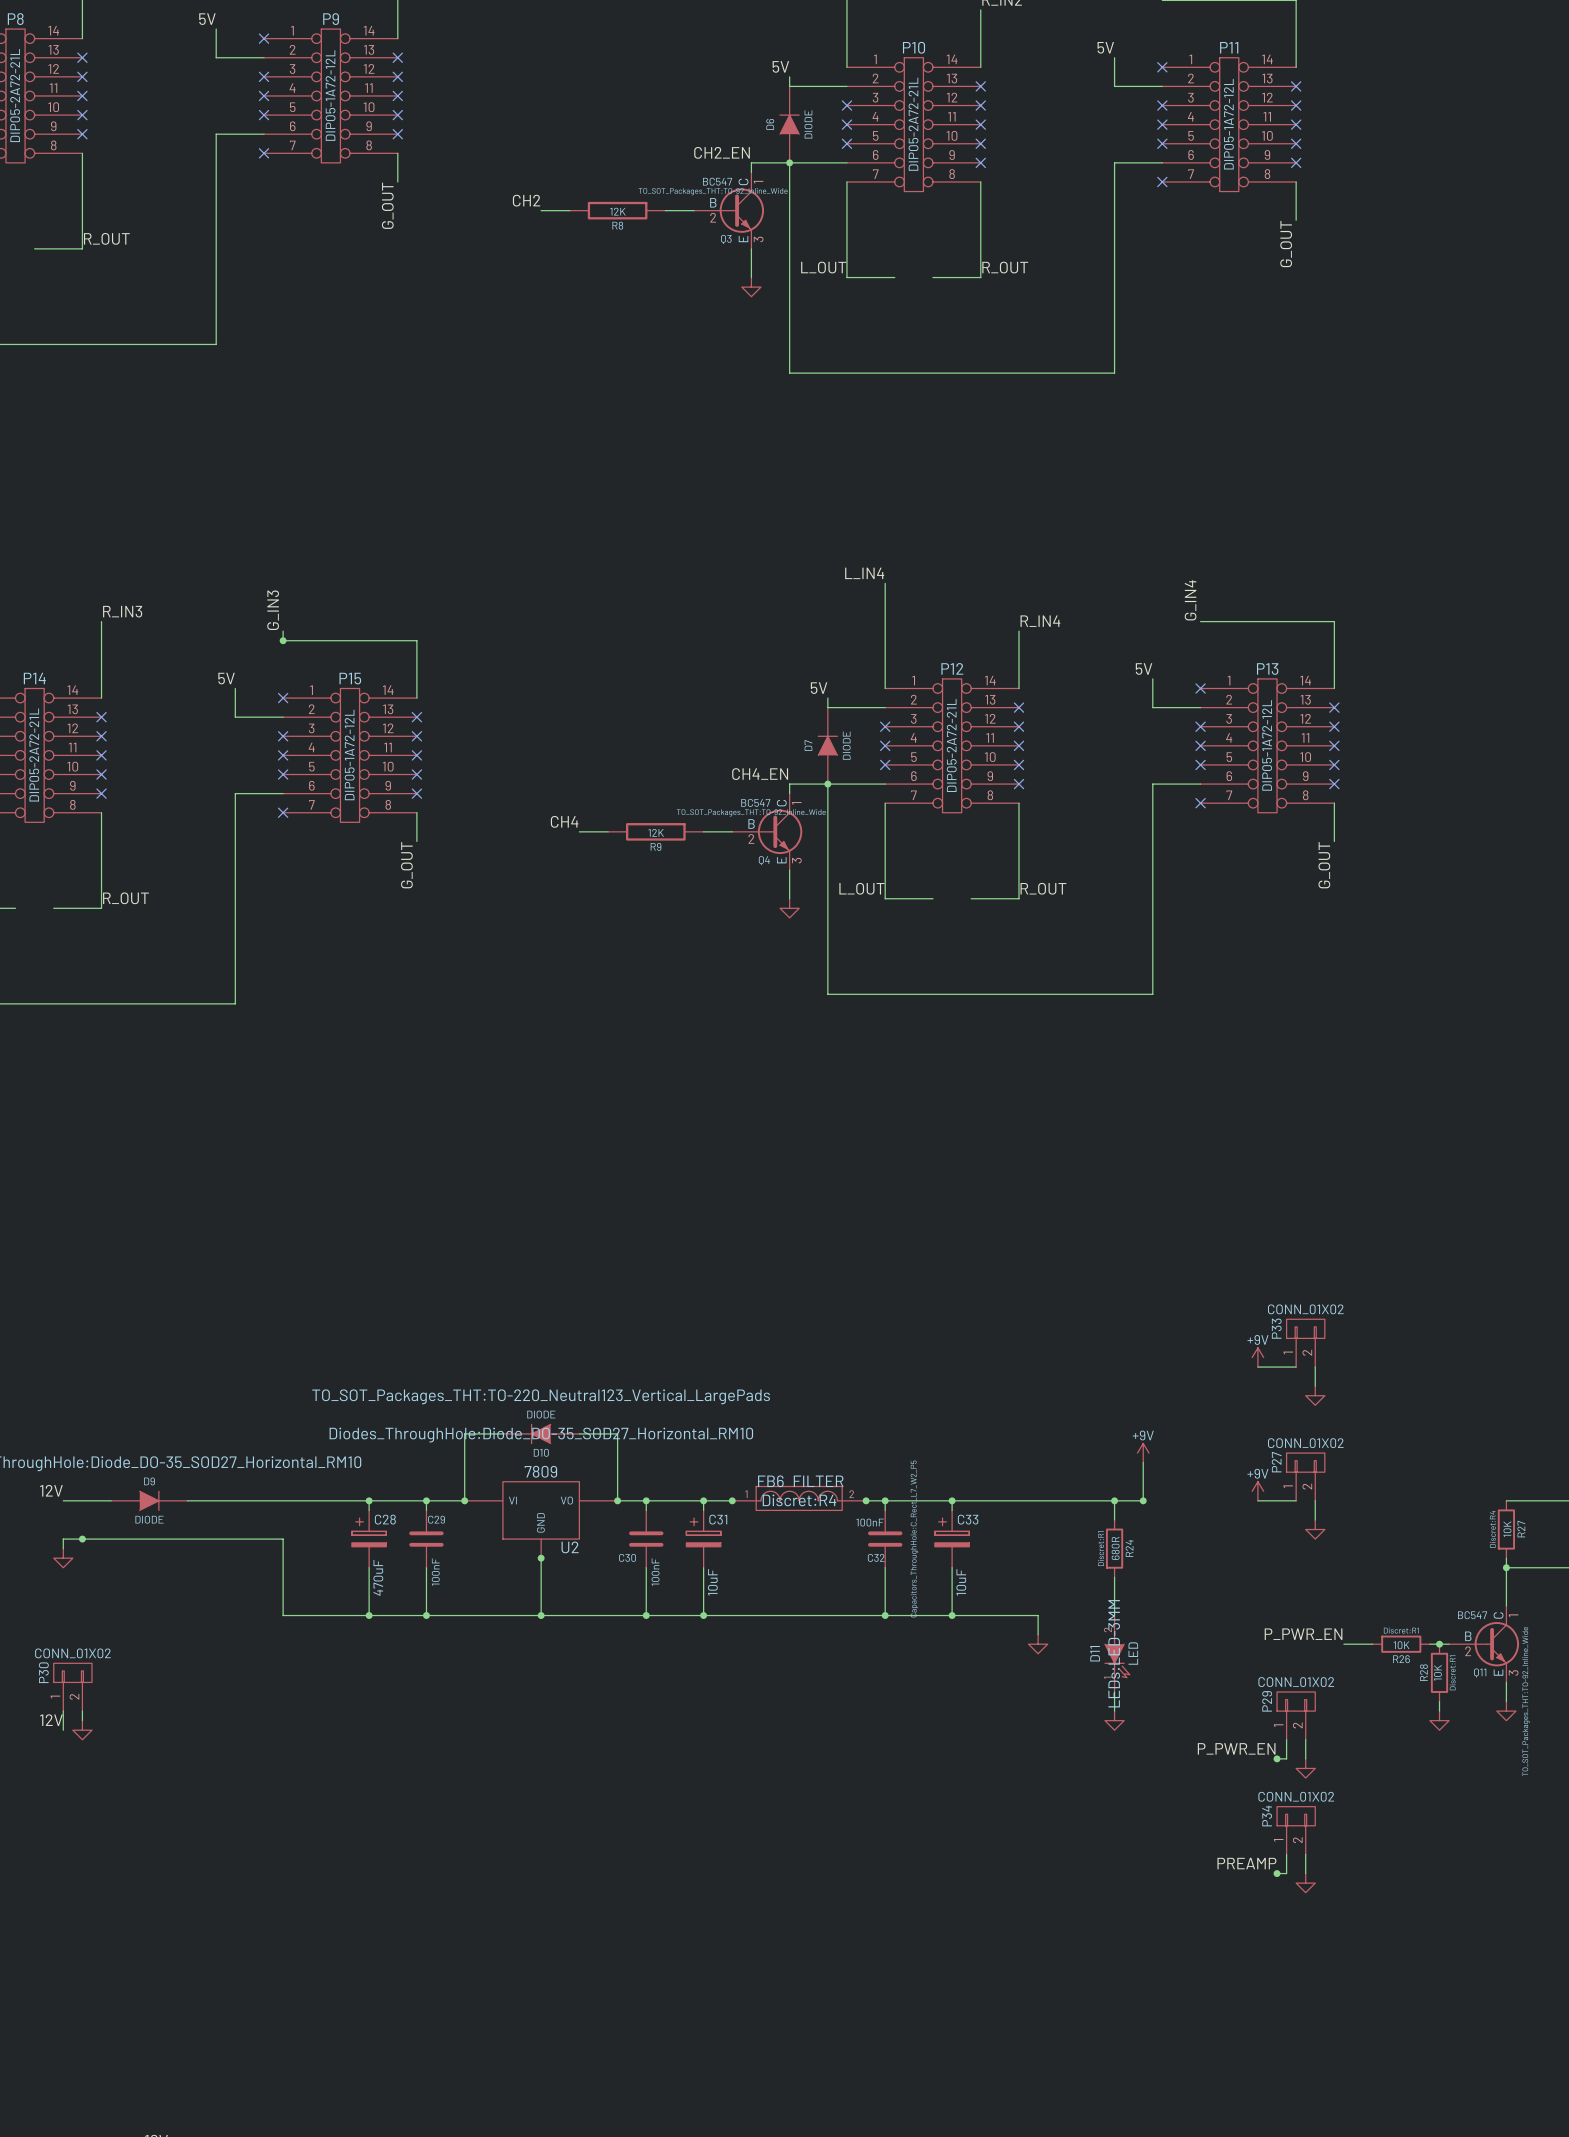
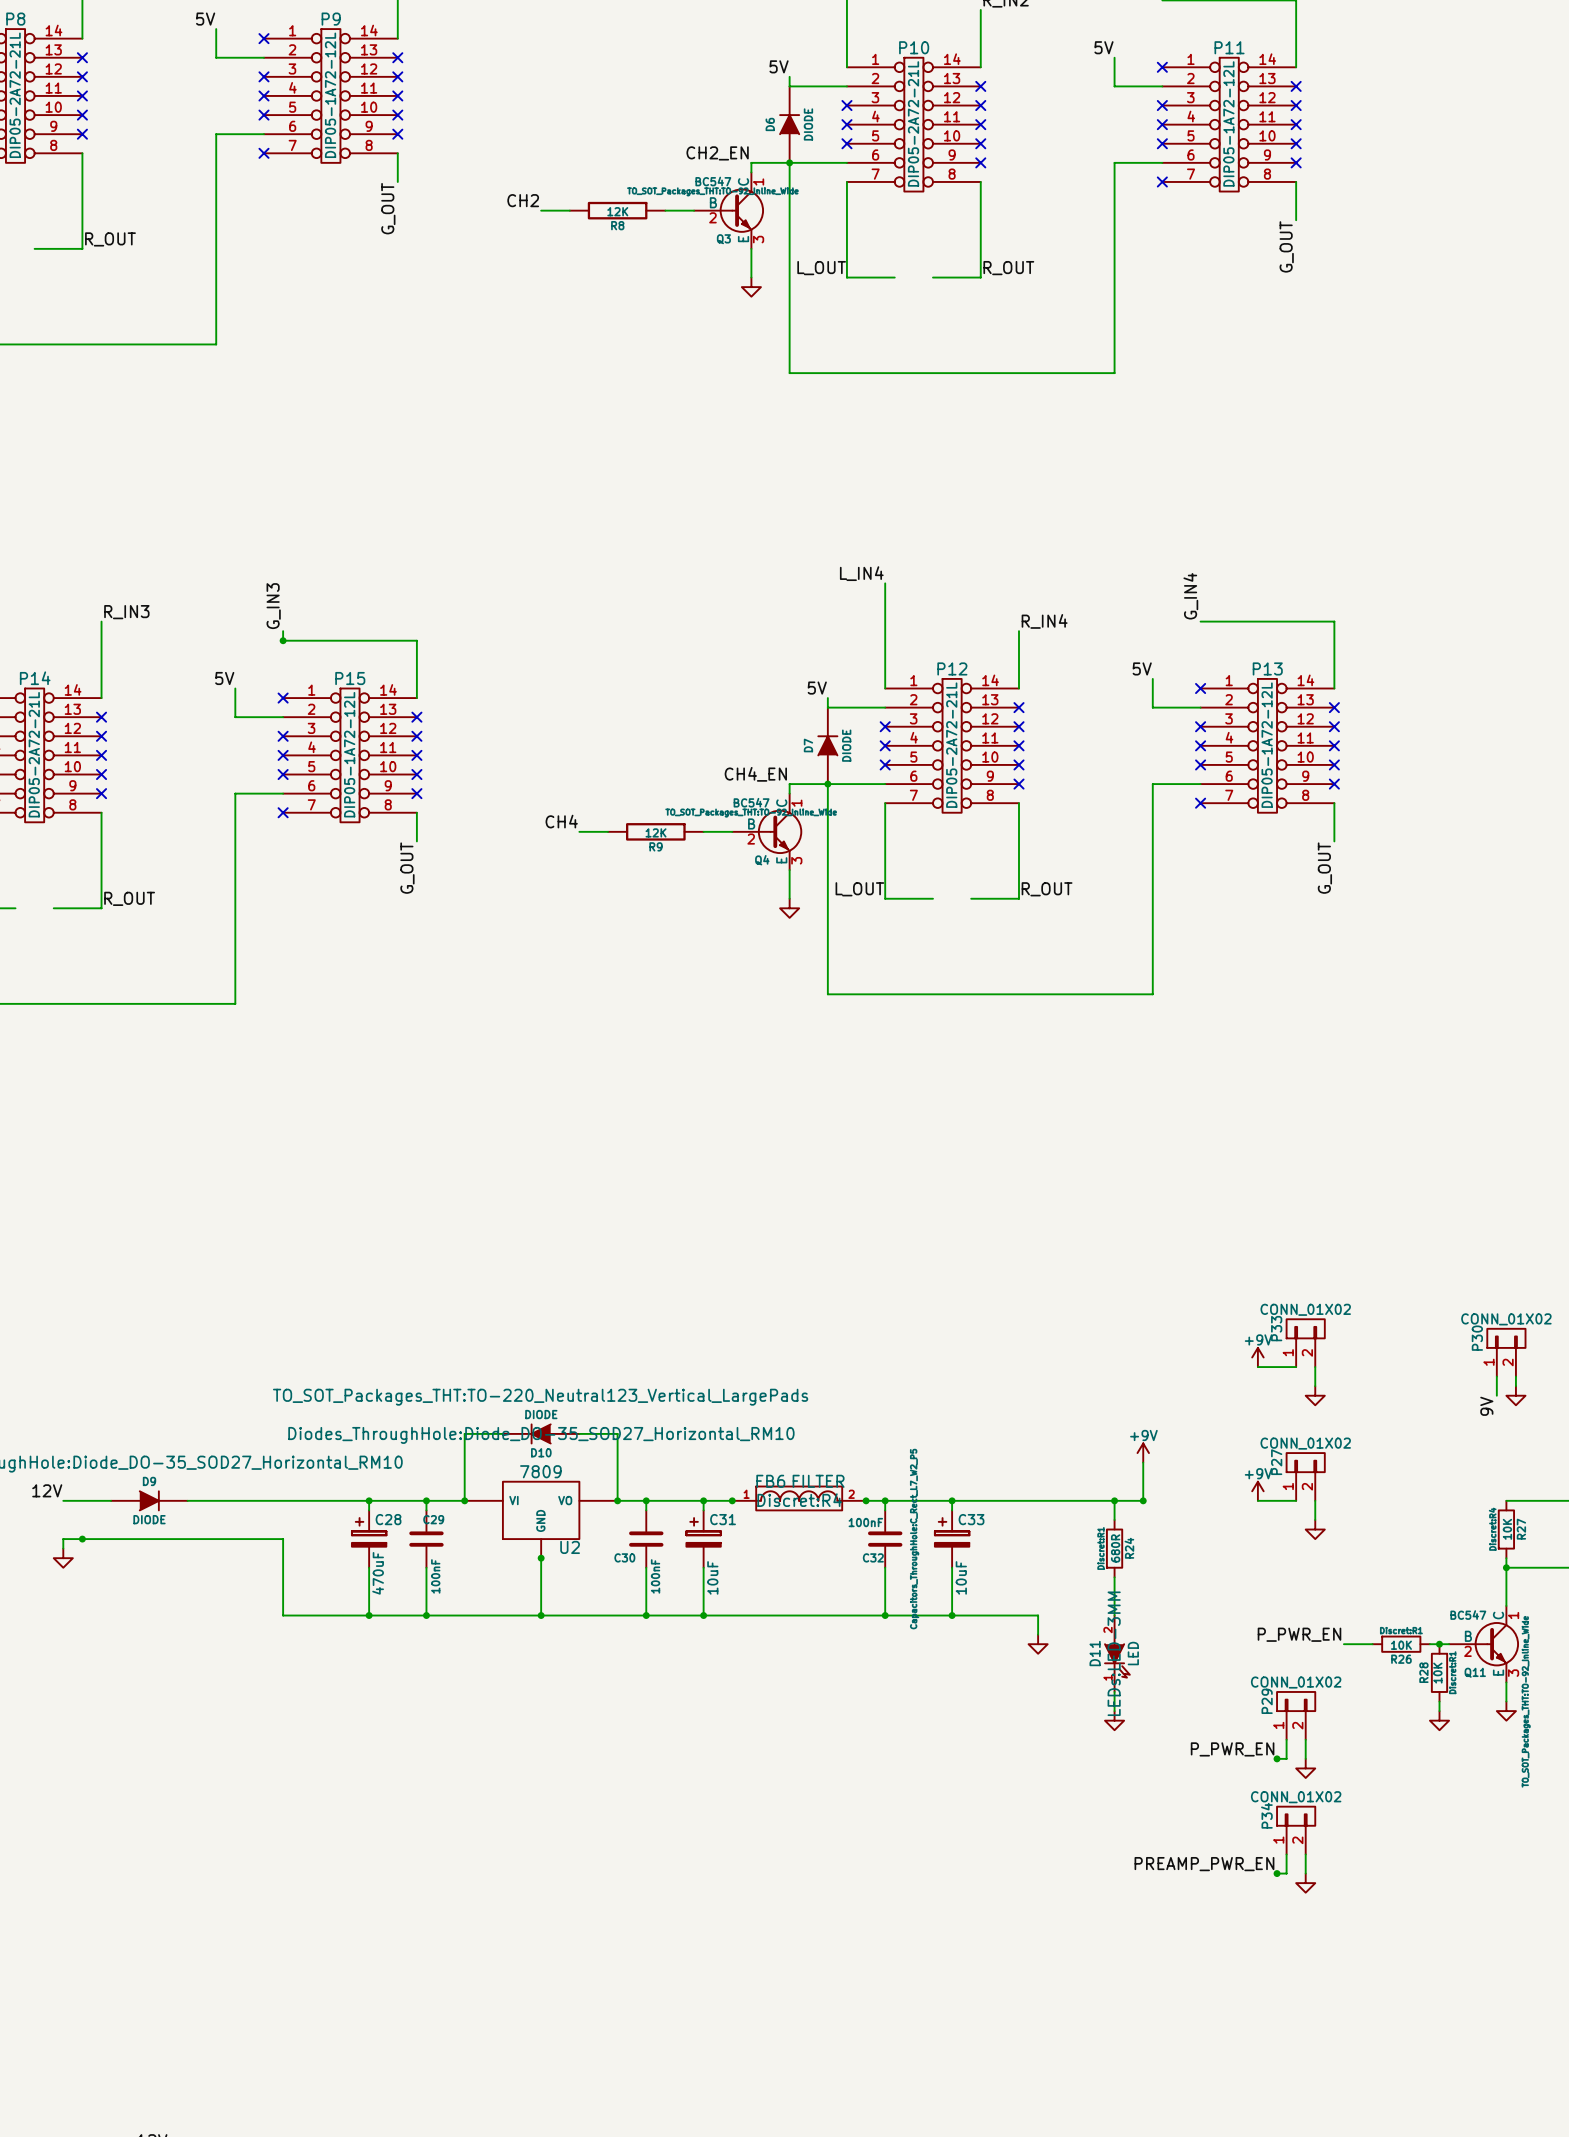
wire: none -> (1496, 1376) (1496, 1395)
wire: none -> (1515, 1376) (1515, 1386)
power symbol: none -> (1515, 1395)
label: none -> 9V (1486, 1406)
P30 position: (72, 1687) -> (1506, 1352)
wire: (63, 1711) (63, 1730) -> none
wire: (82, 1711) (82, 1720) -> none
label: 12V (51, 1720) -> none
power symbol: (82, 1730) -> none
label: PREAMP (1246, 1863) -> PREAMP_PWR_EN (1204, 1864)

